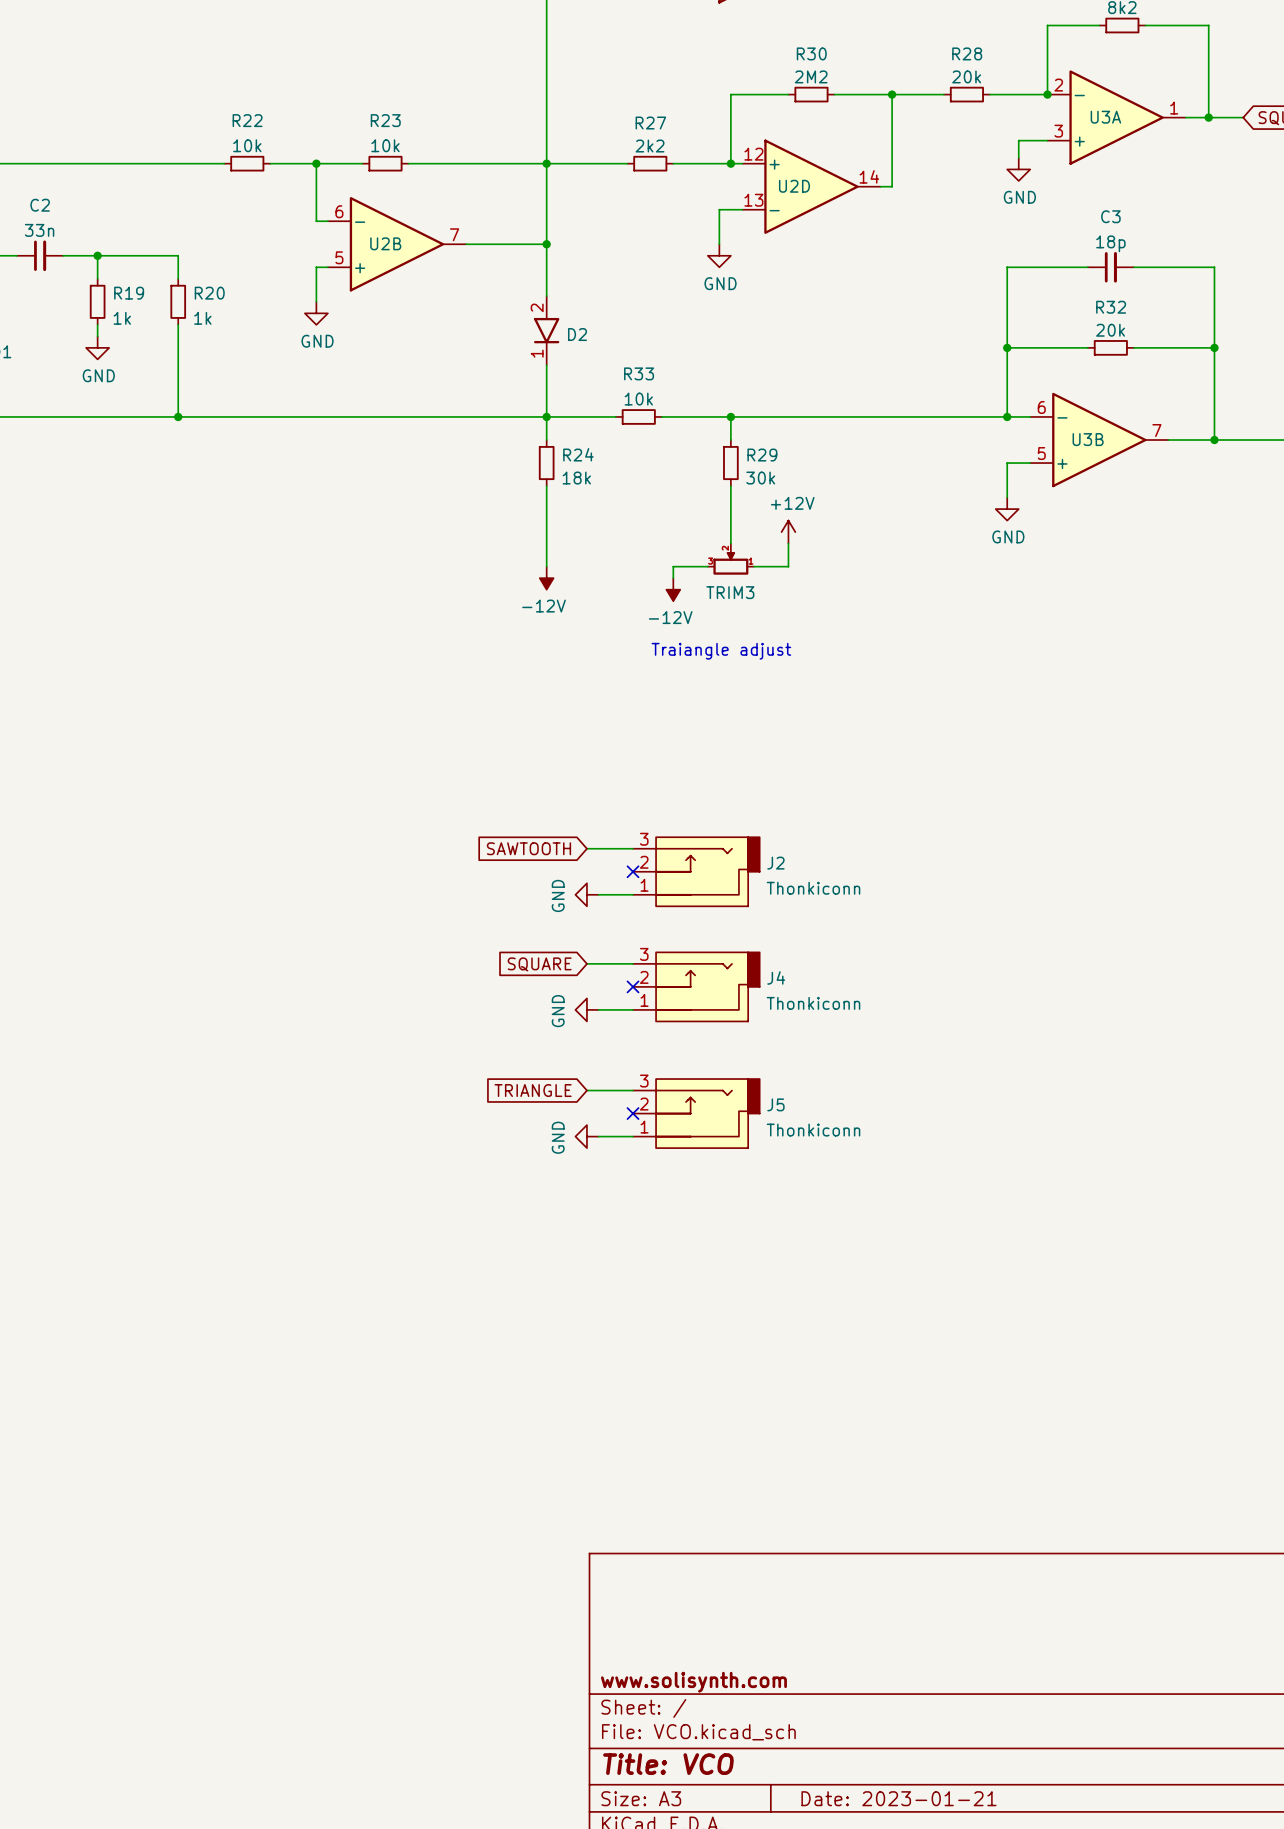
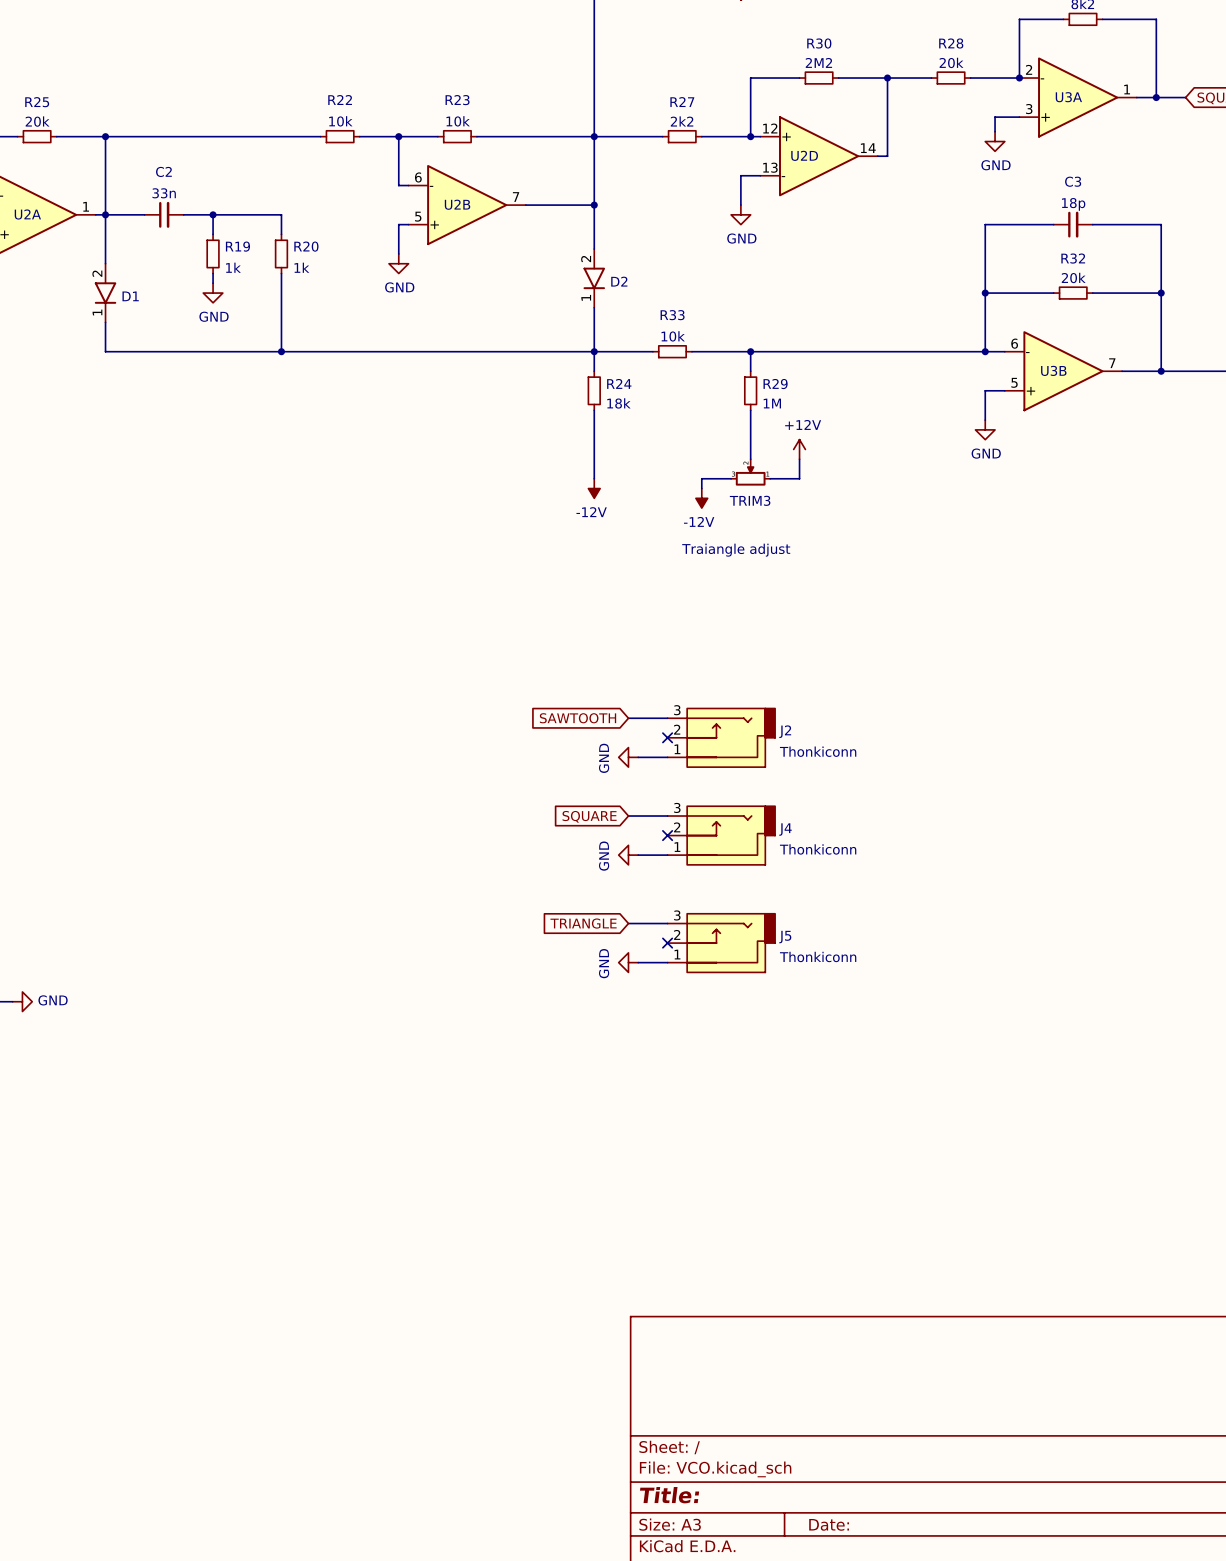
R29 value: 30k (760, 478) -> 1M (772, 403)
title block: www.solisynth.com (693, 1682) -> none
title block: Title: VCO (668, 1764) -> Title: (669, 1495)
title block: Date: 2023-01-21 (898, 1798) -> Date: (829, 1524)

